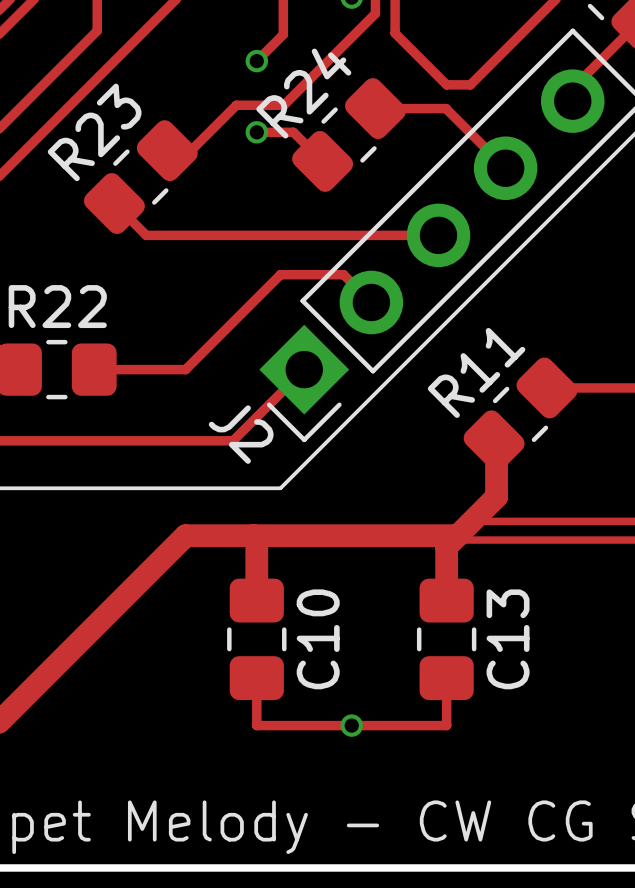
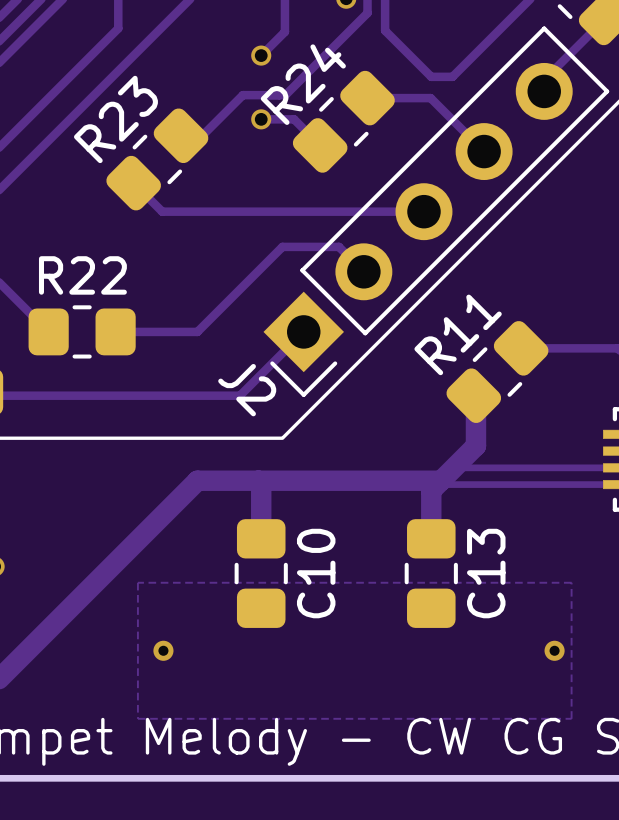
zone outline: none -> (137, 582) (137, 718) (571, 718) (571, 582) (137, 582)
track: (256, 678) (256, 725) (446, 725) (446, 678) -> none
via: none -> (163, 650)
via: (351, 725) -> none
via: none -> (554, 650)

